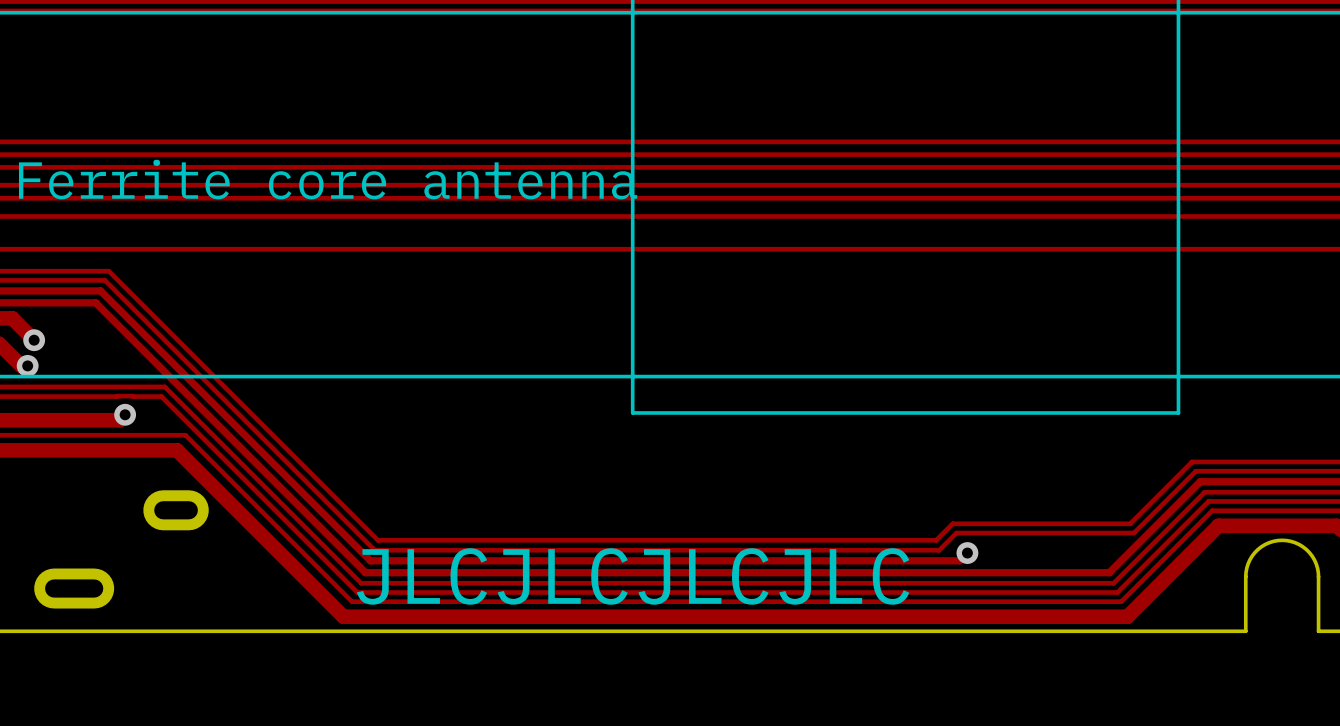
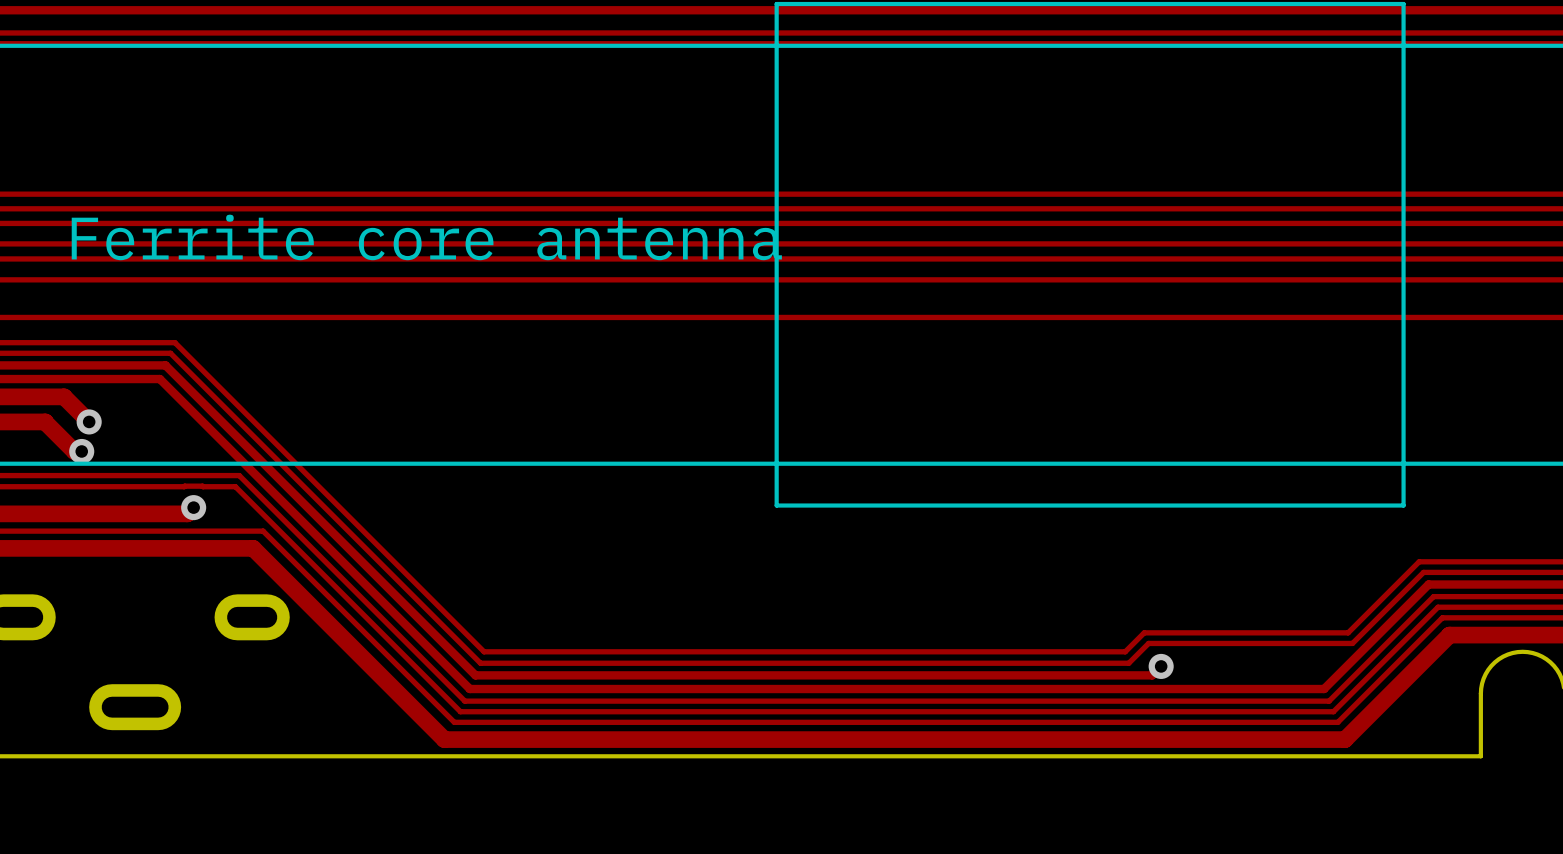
text: JLCJLCJLCJLC (633, 576) -> none

